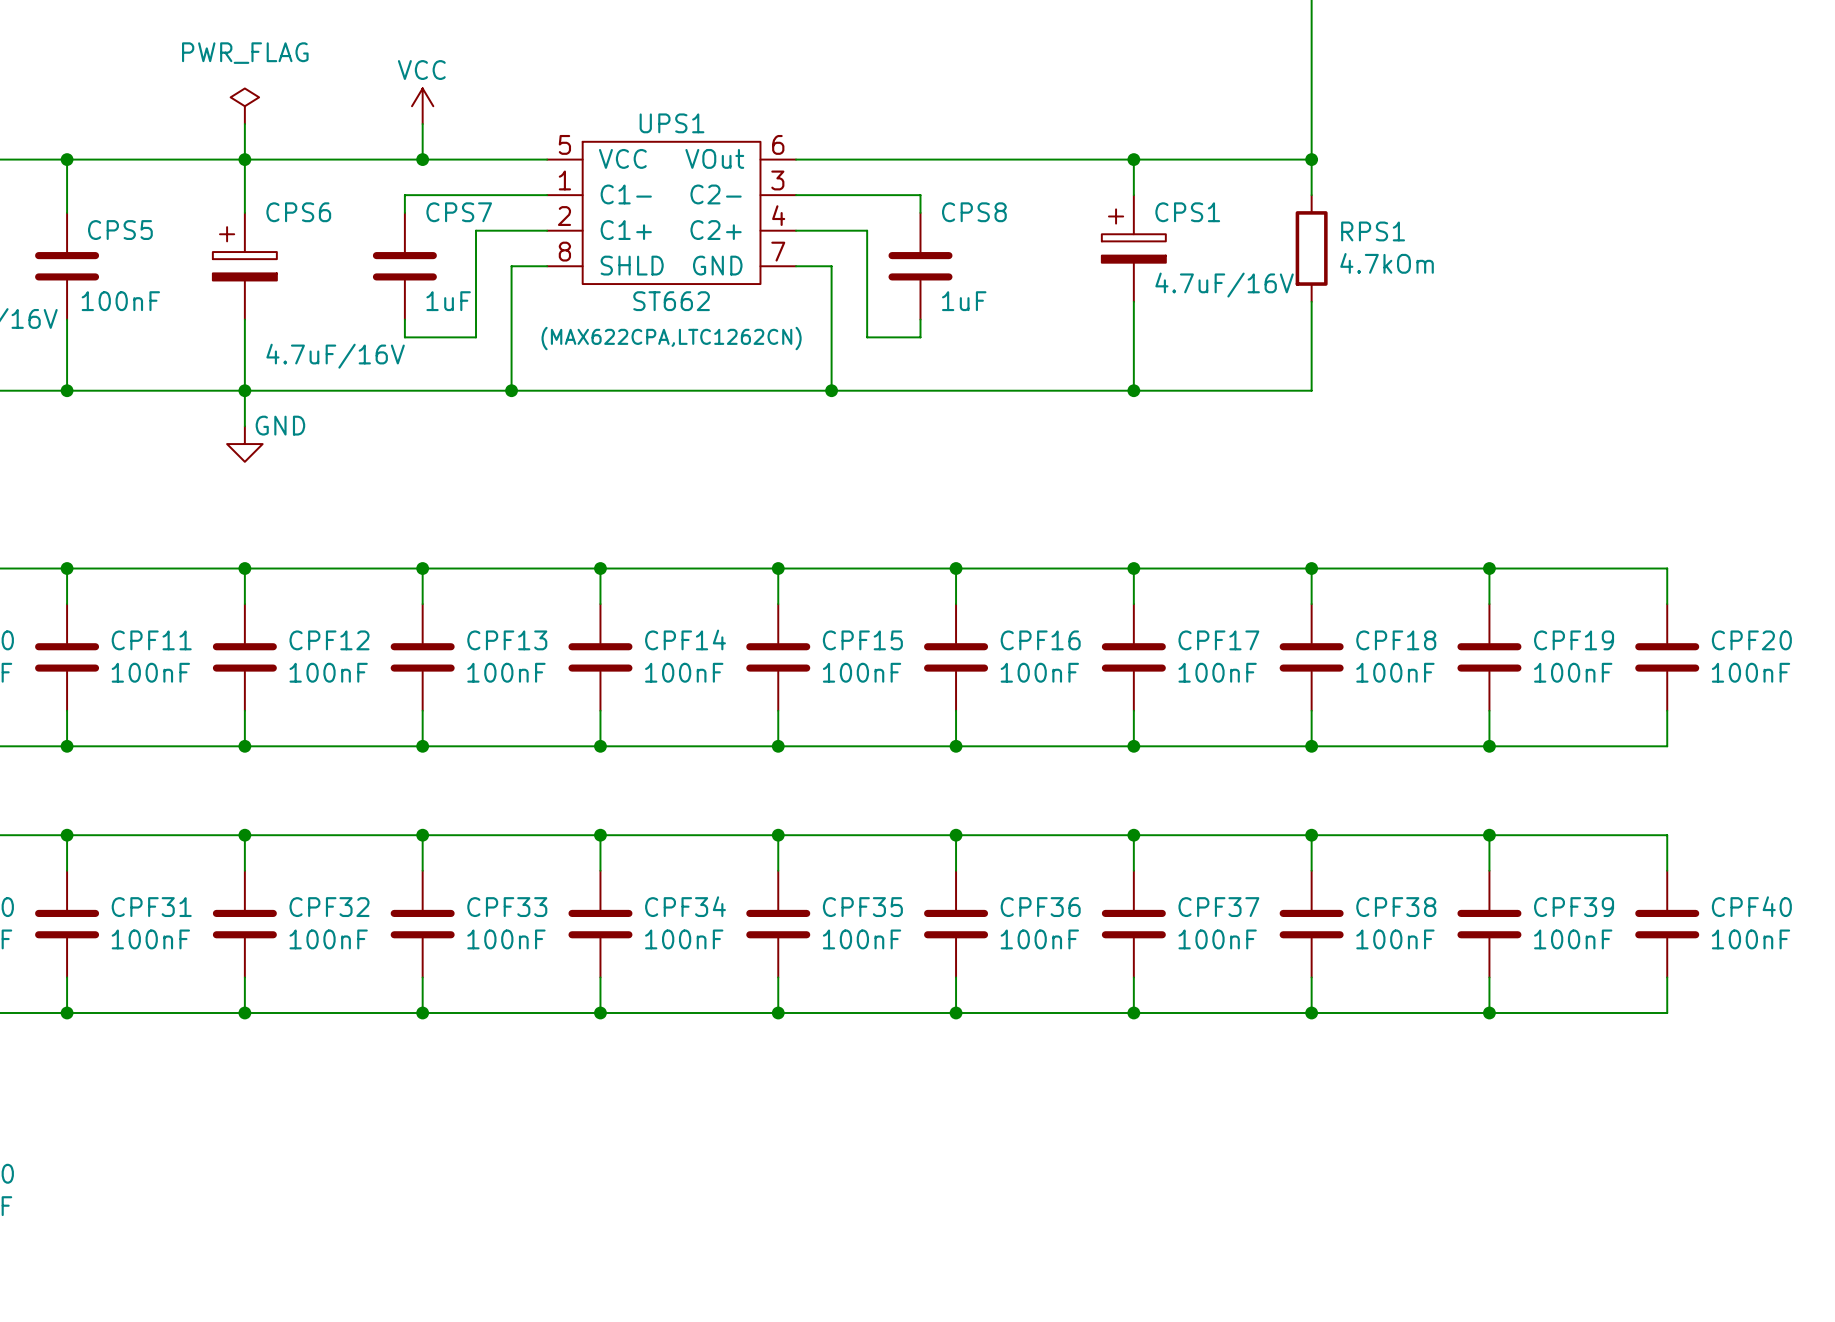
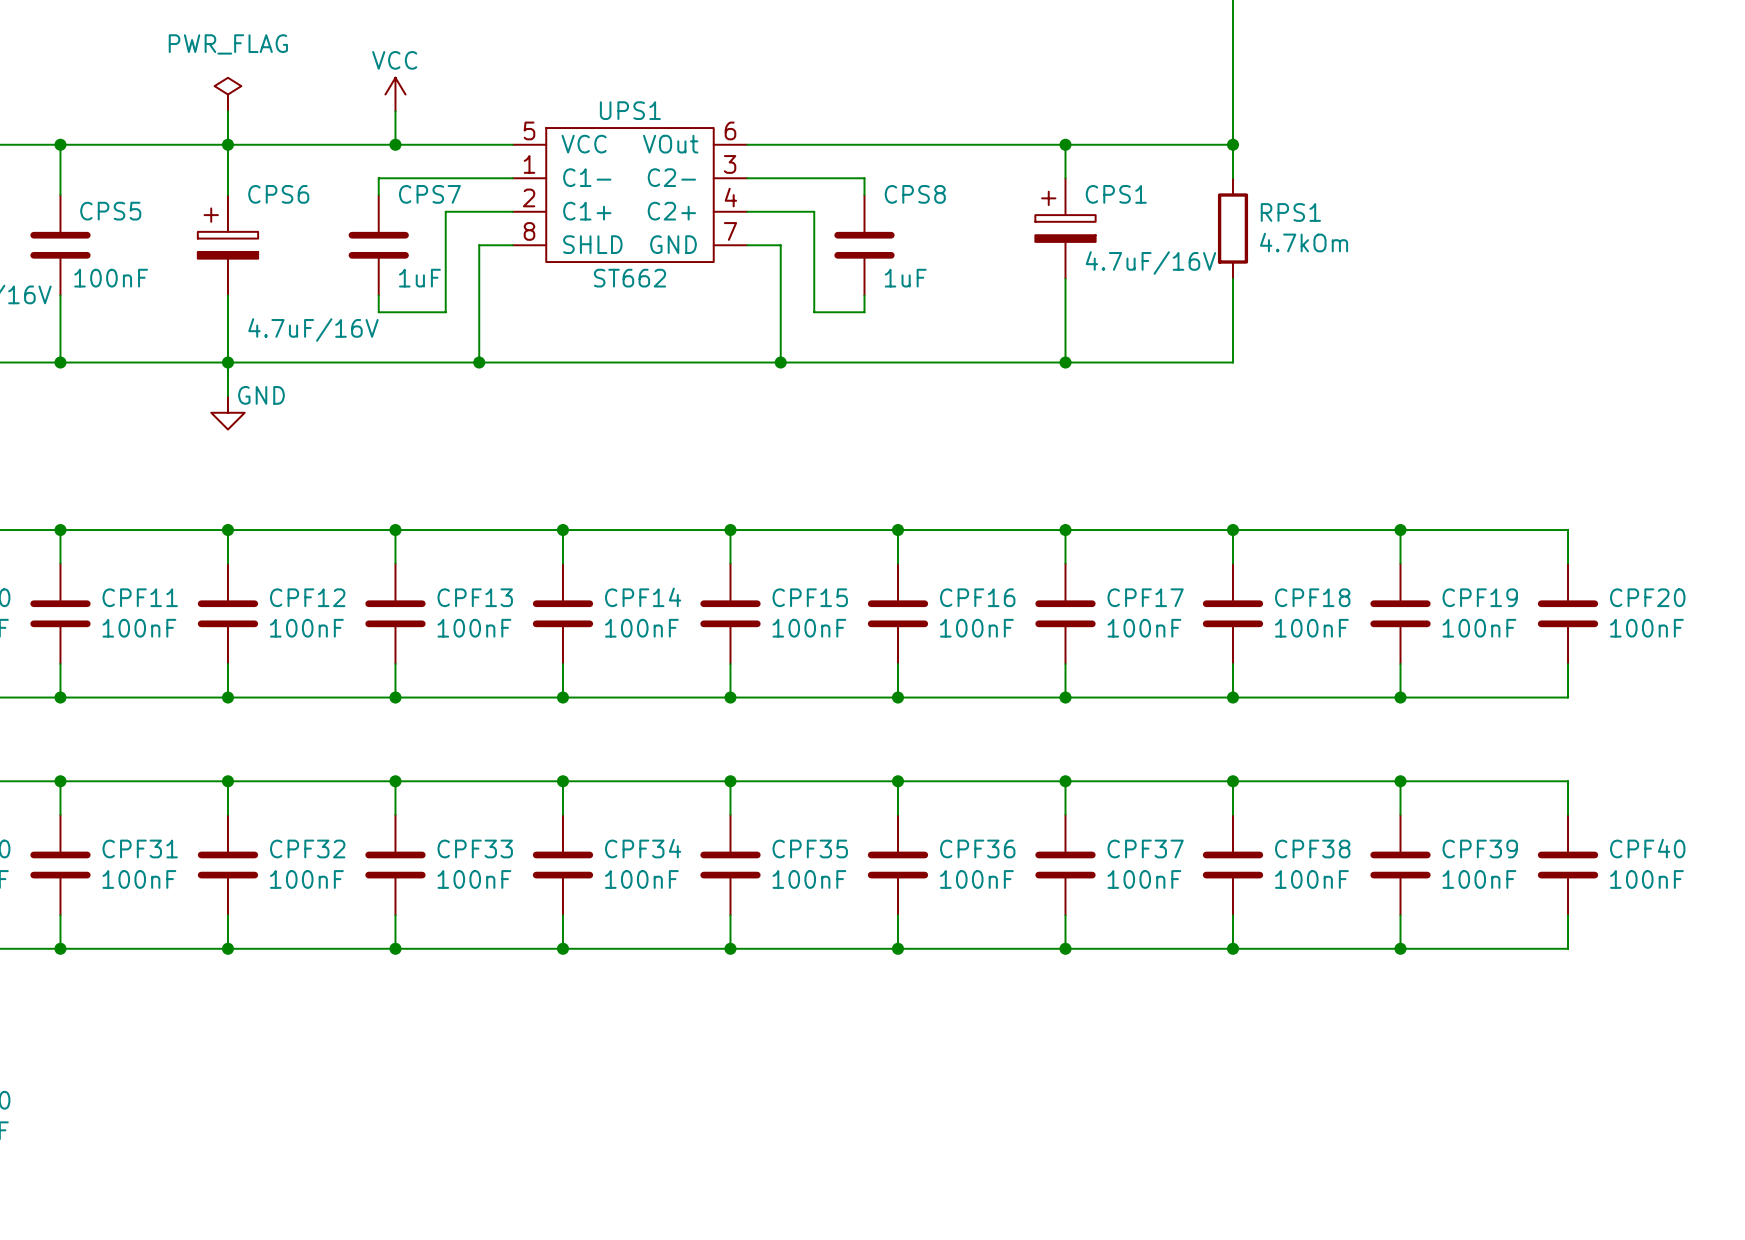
UPS1 text: (MAX622CPA,LTC1262CN) (671, 338) -> none

